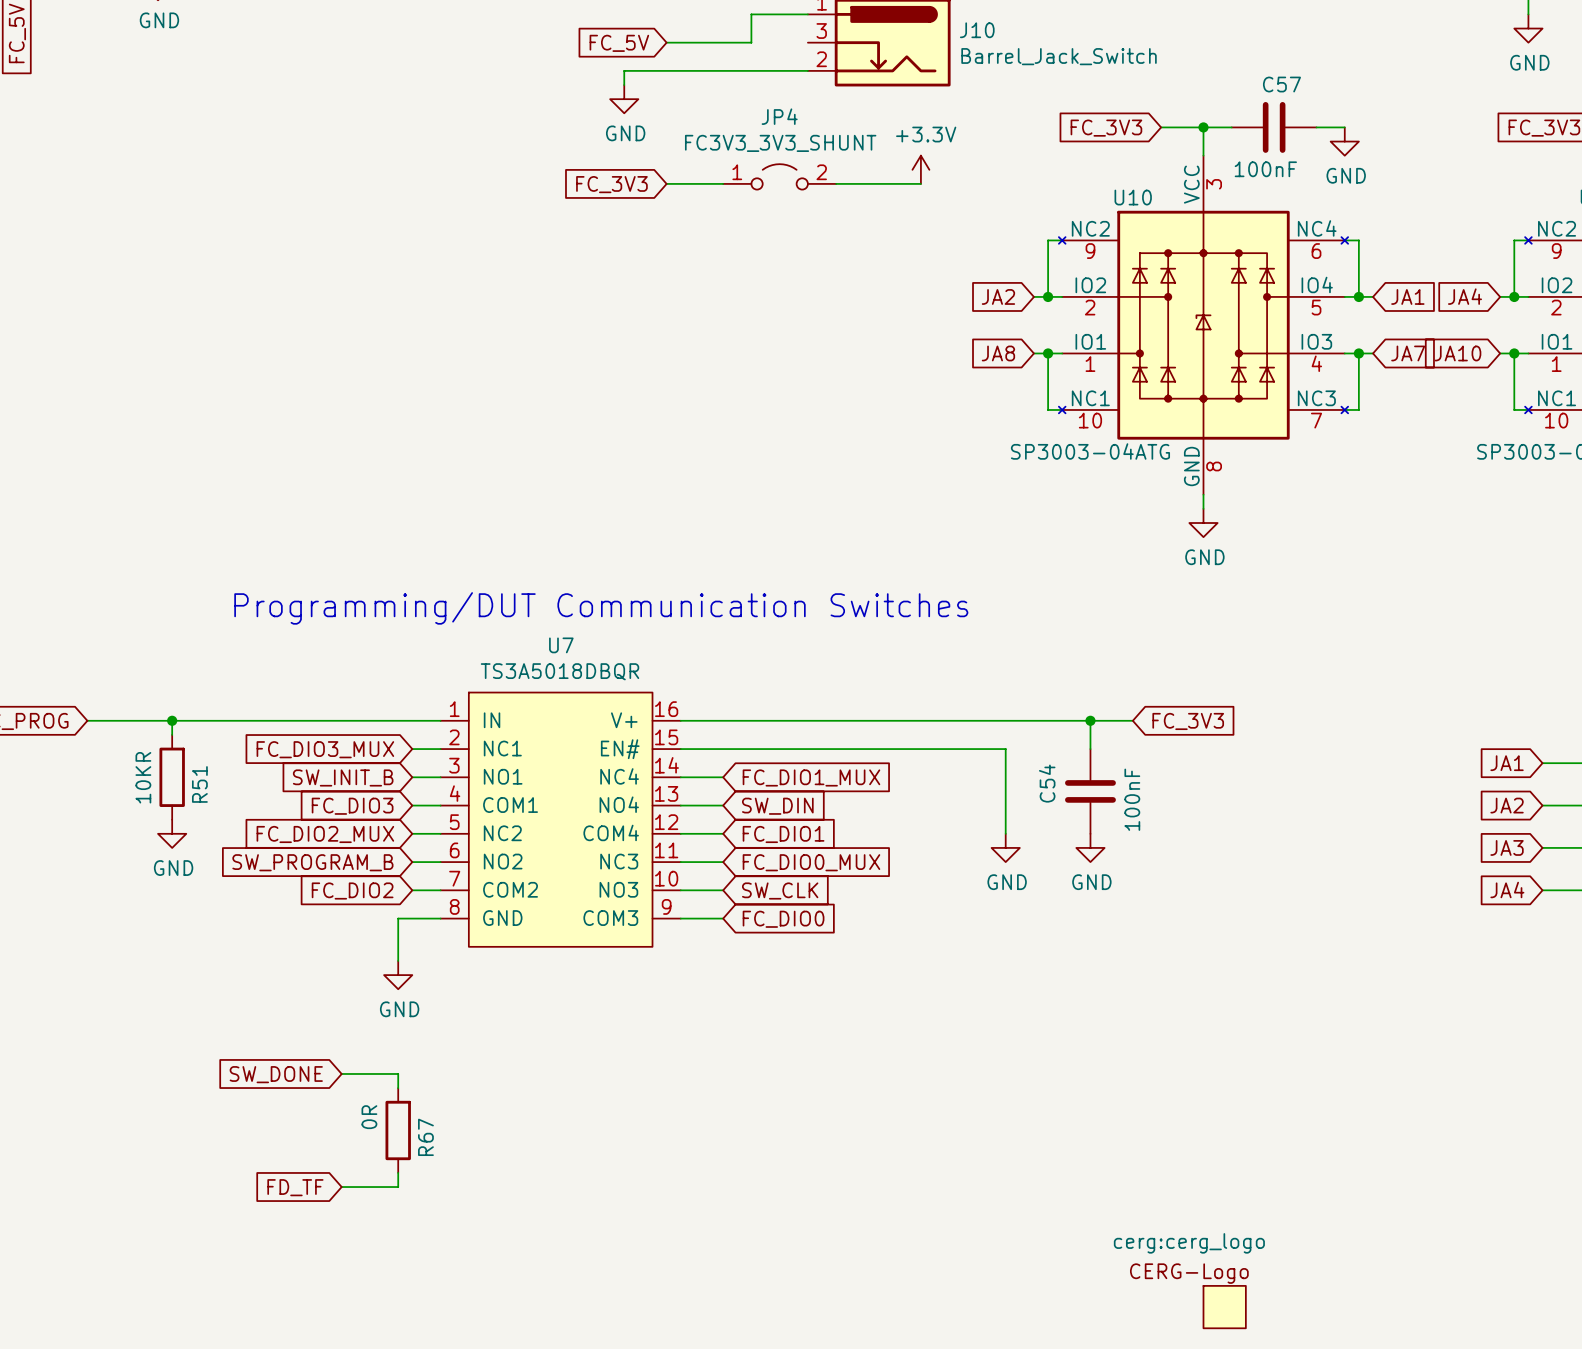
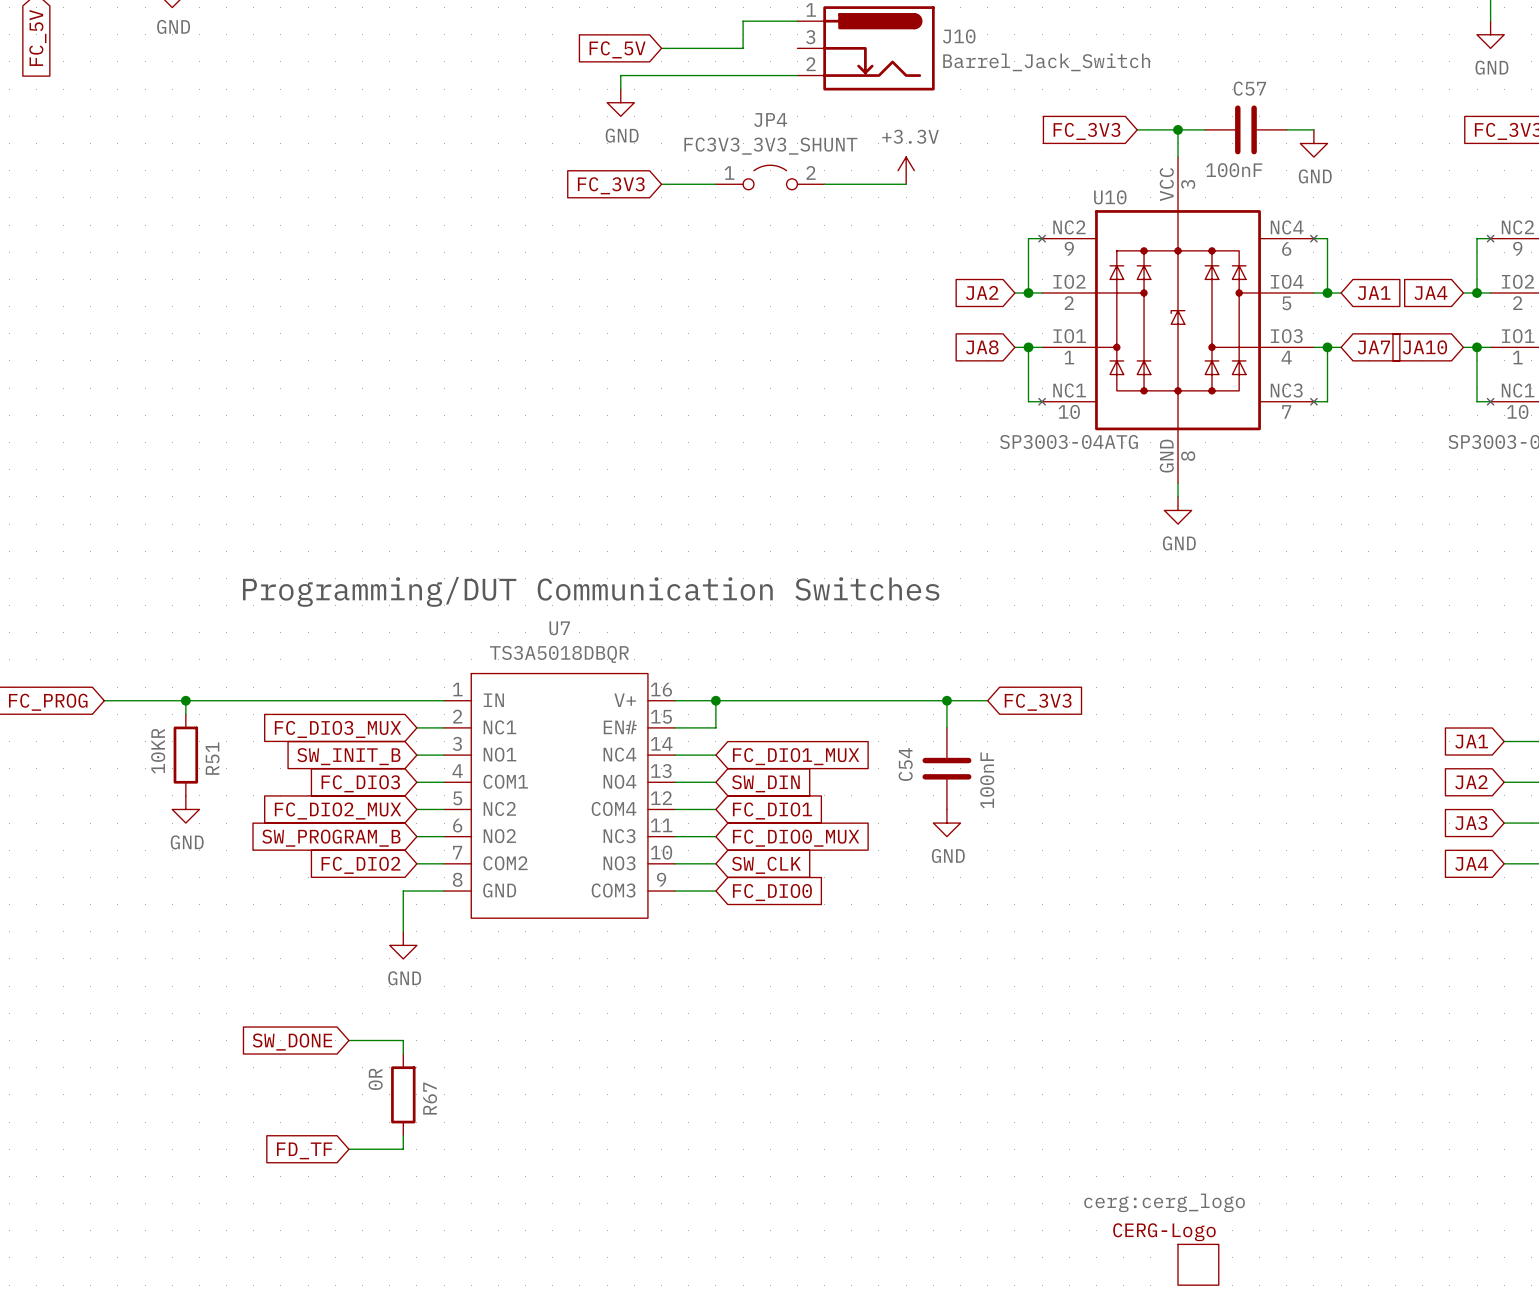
junction: none -> (715, 700)
junction: none -> (946, 700)
wire: (1005, 720) (1132, 720) -> none
wire: (1090, 720) (1090, 749) -> (946, 700) (946, 727)
junction: (1090, 720) -> none
global label position: FC_3V3 (1188, 721) -> FC_3V3 (1038, 702)
wire: (723, 749) (1005, 749) (1005, 833) -> (715, 727) (715, 700)
C54 position: (1090, 791) -> (946, 768)
power symbol position: GND (1005, 847) -> GND (946, 823)
power symbol: GND (1090, 847) -> none

